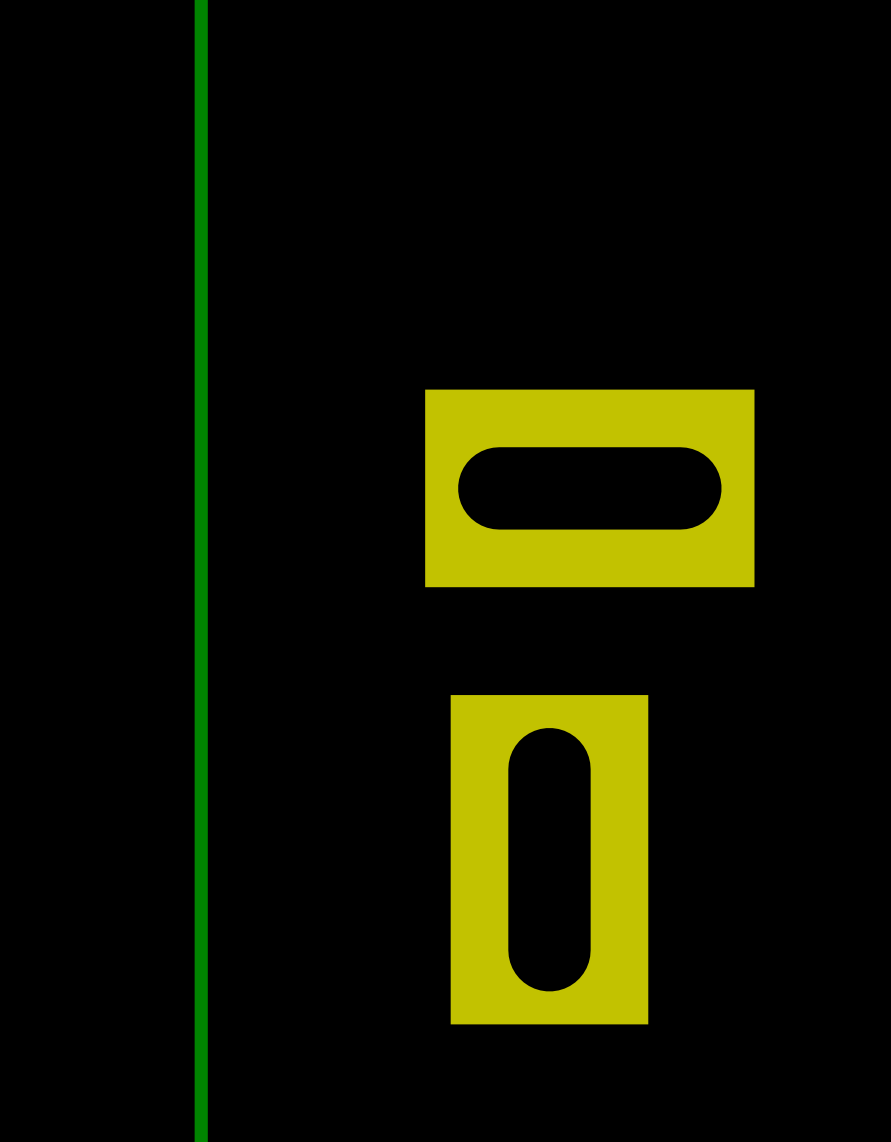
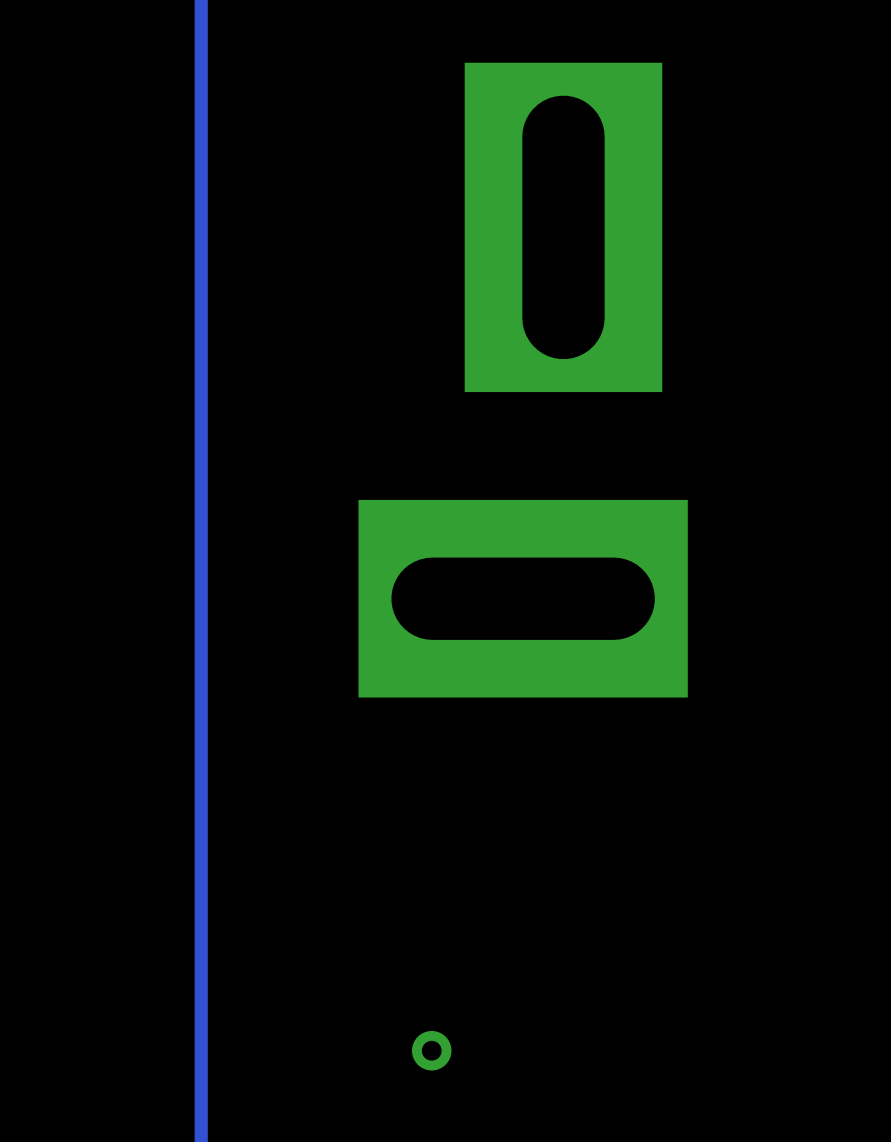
part rotation: 0° (589, 706) -> 180° (523, 380)
via: none -> (431, 1050)

